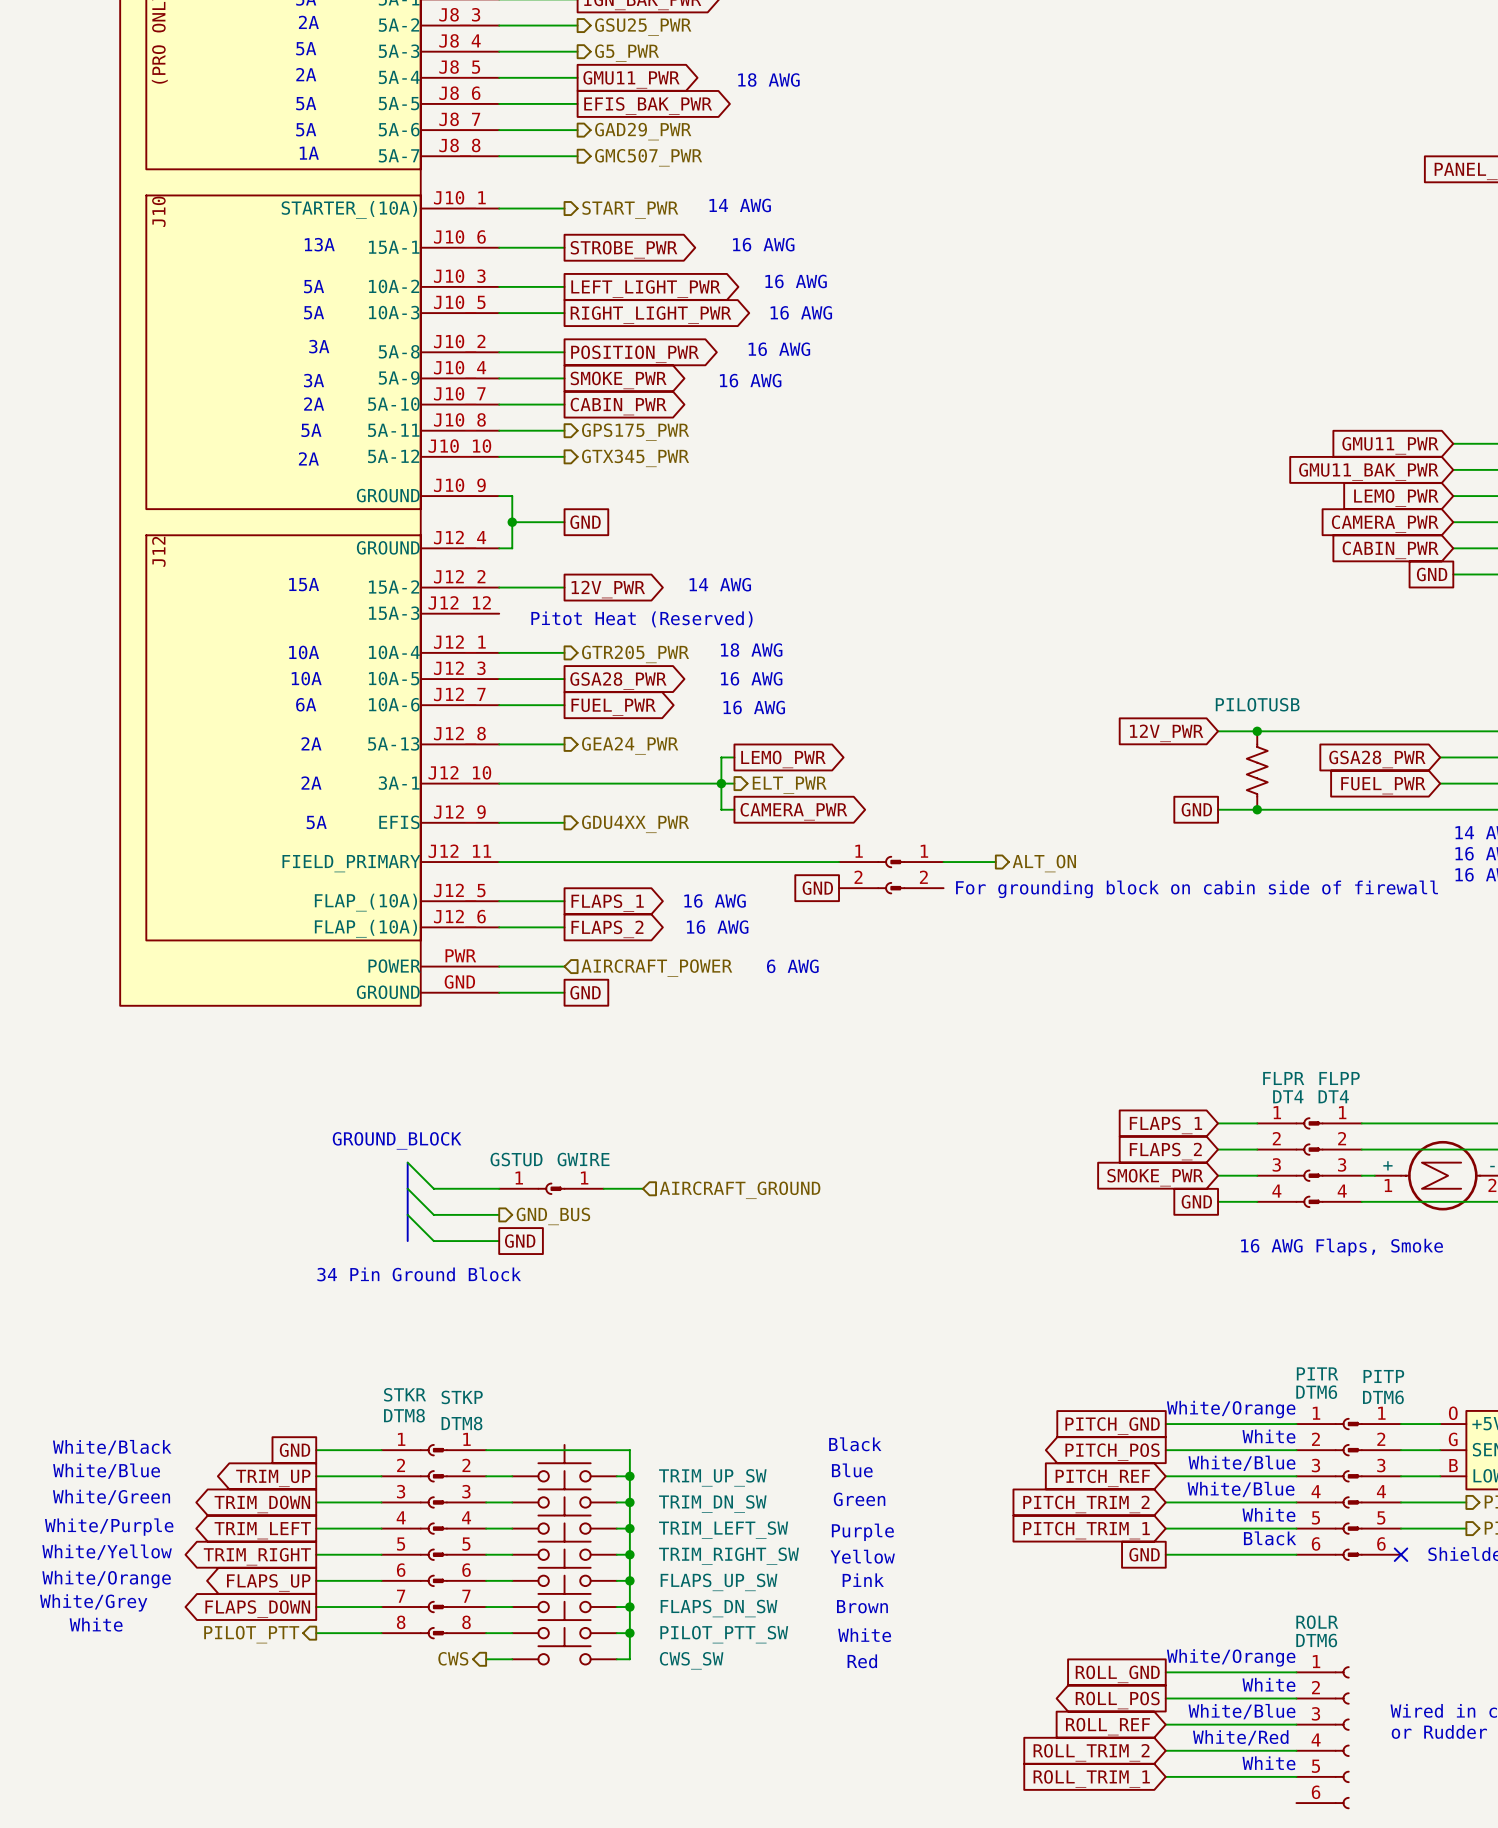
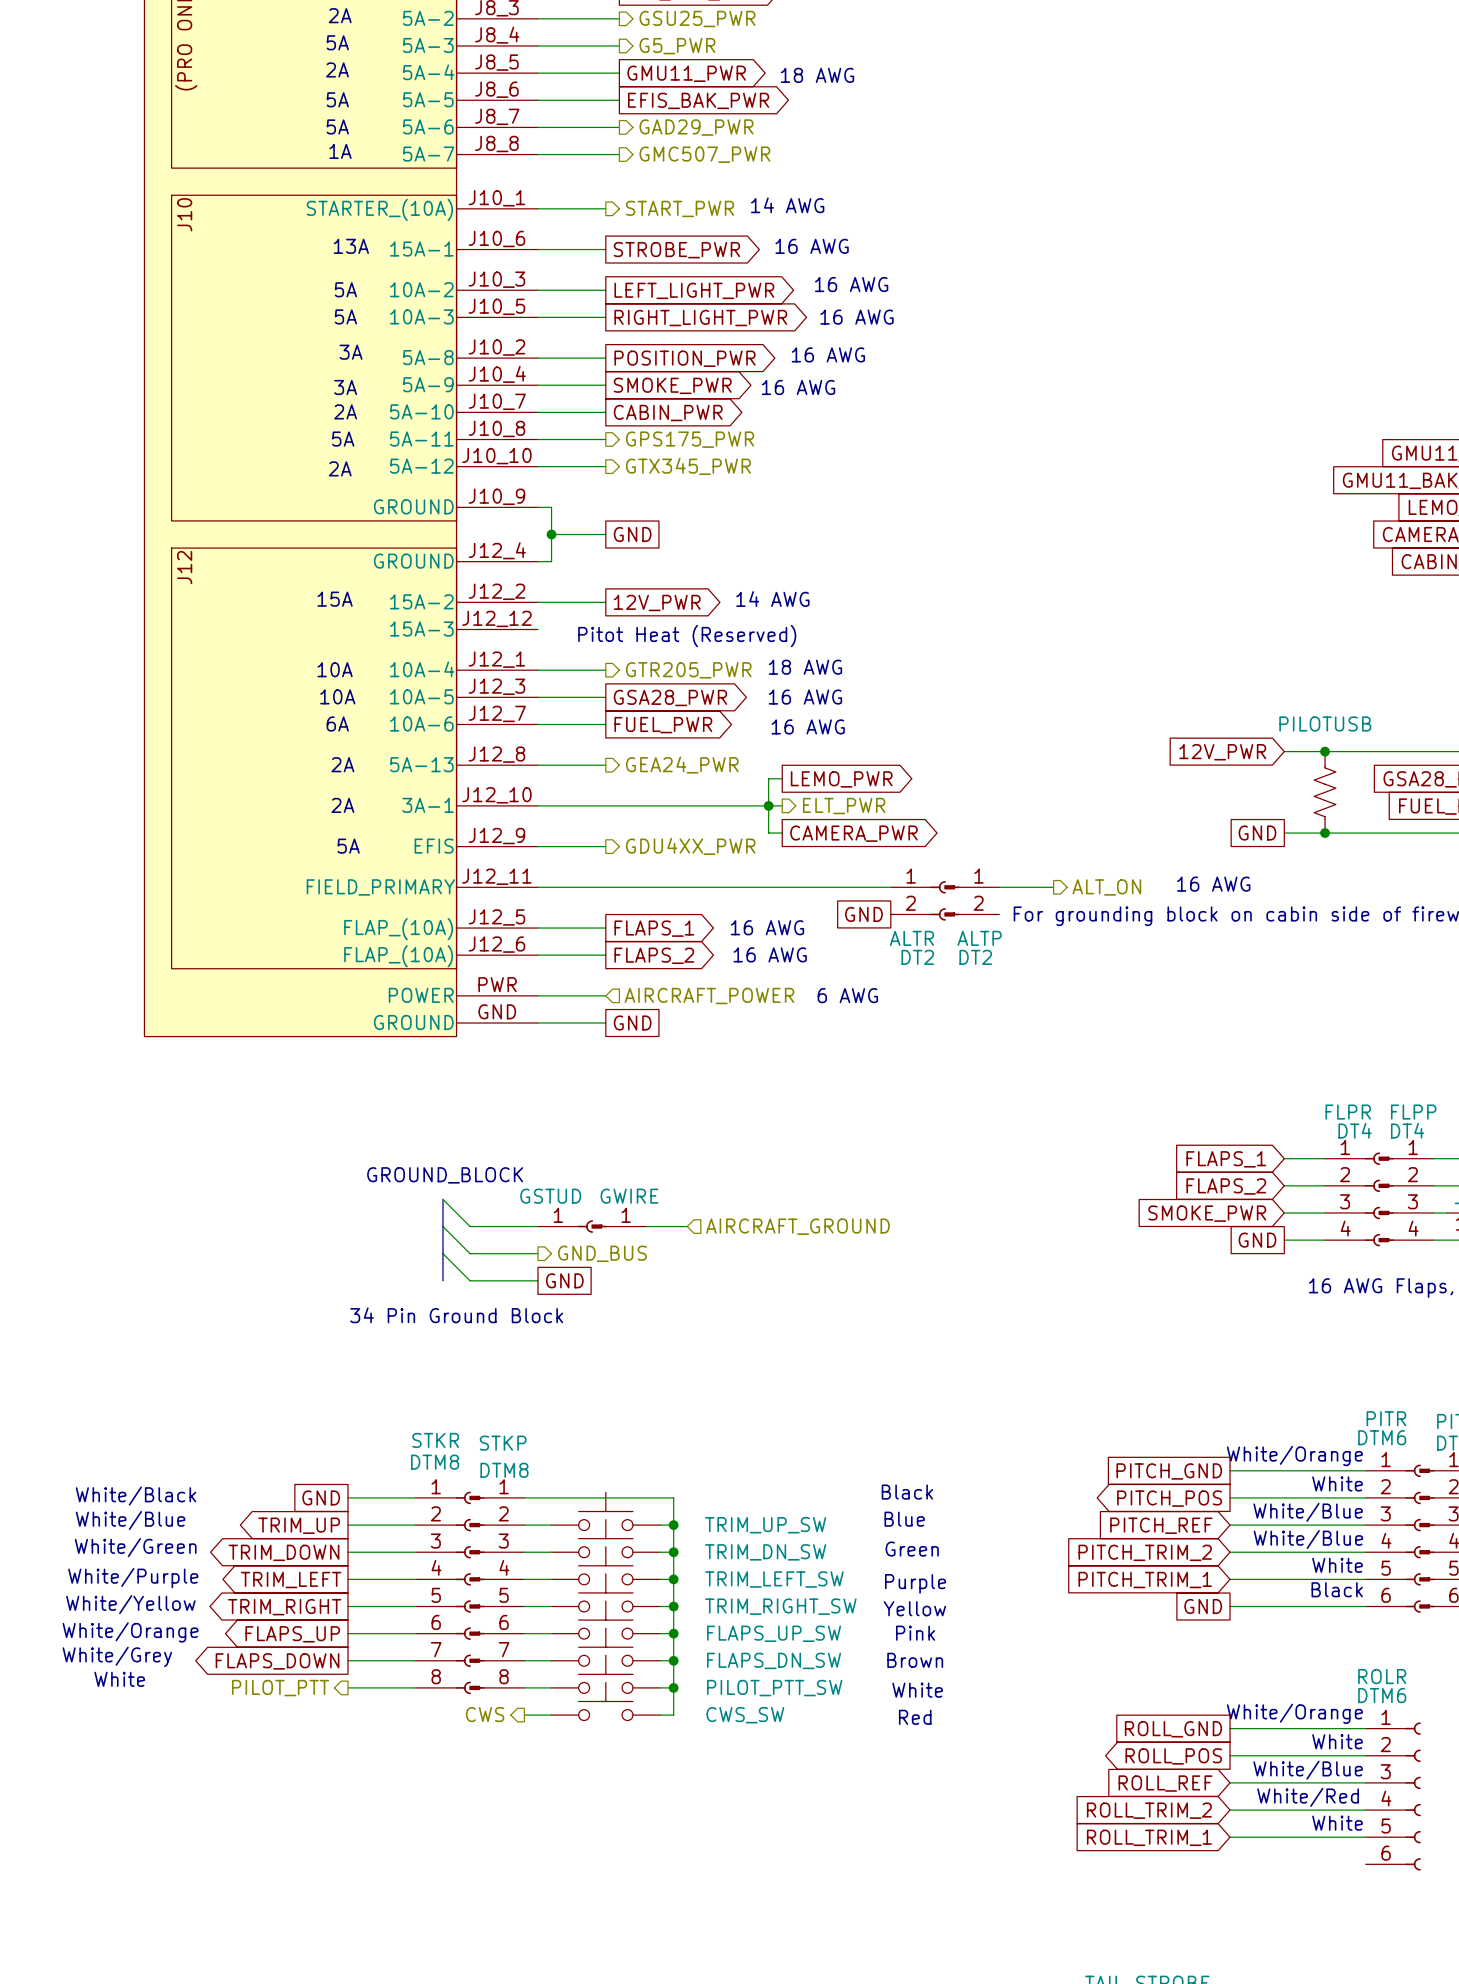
text: none -> 16 AWG (1213, 884)
ALTR name: none -> ALTR (911, 938)
ALTP name: none -> ALTP (979, 938)
ALTR value: none -> DT2 (917, 957)
ALTP value: none -> DT2 (975, 957)

